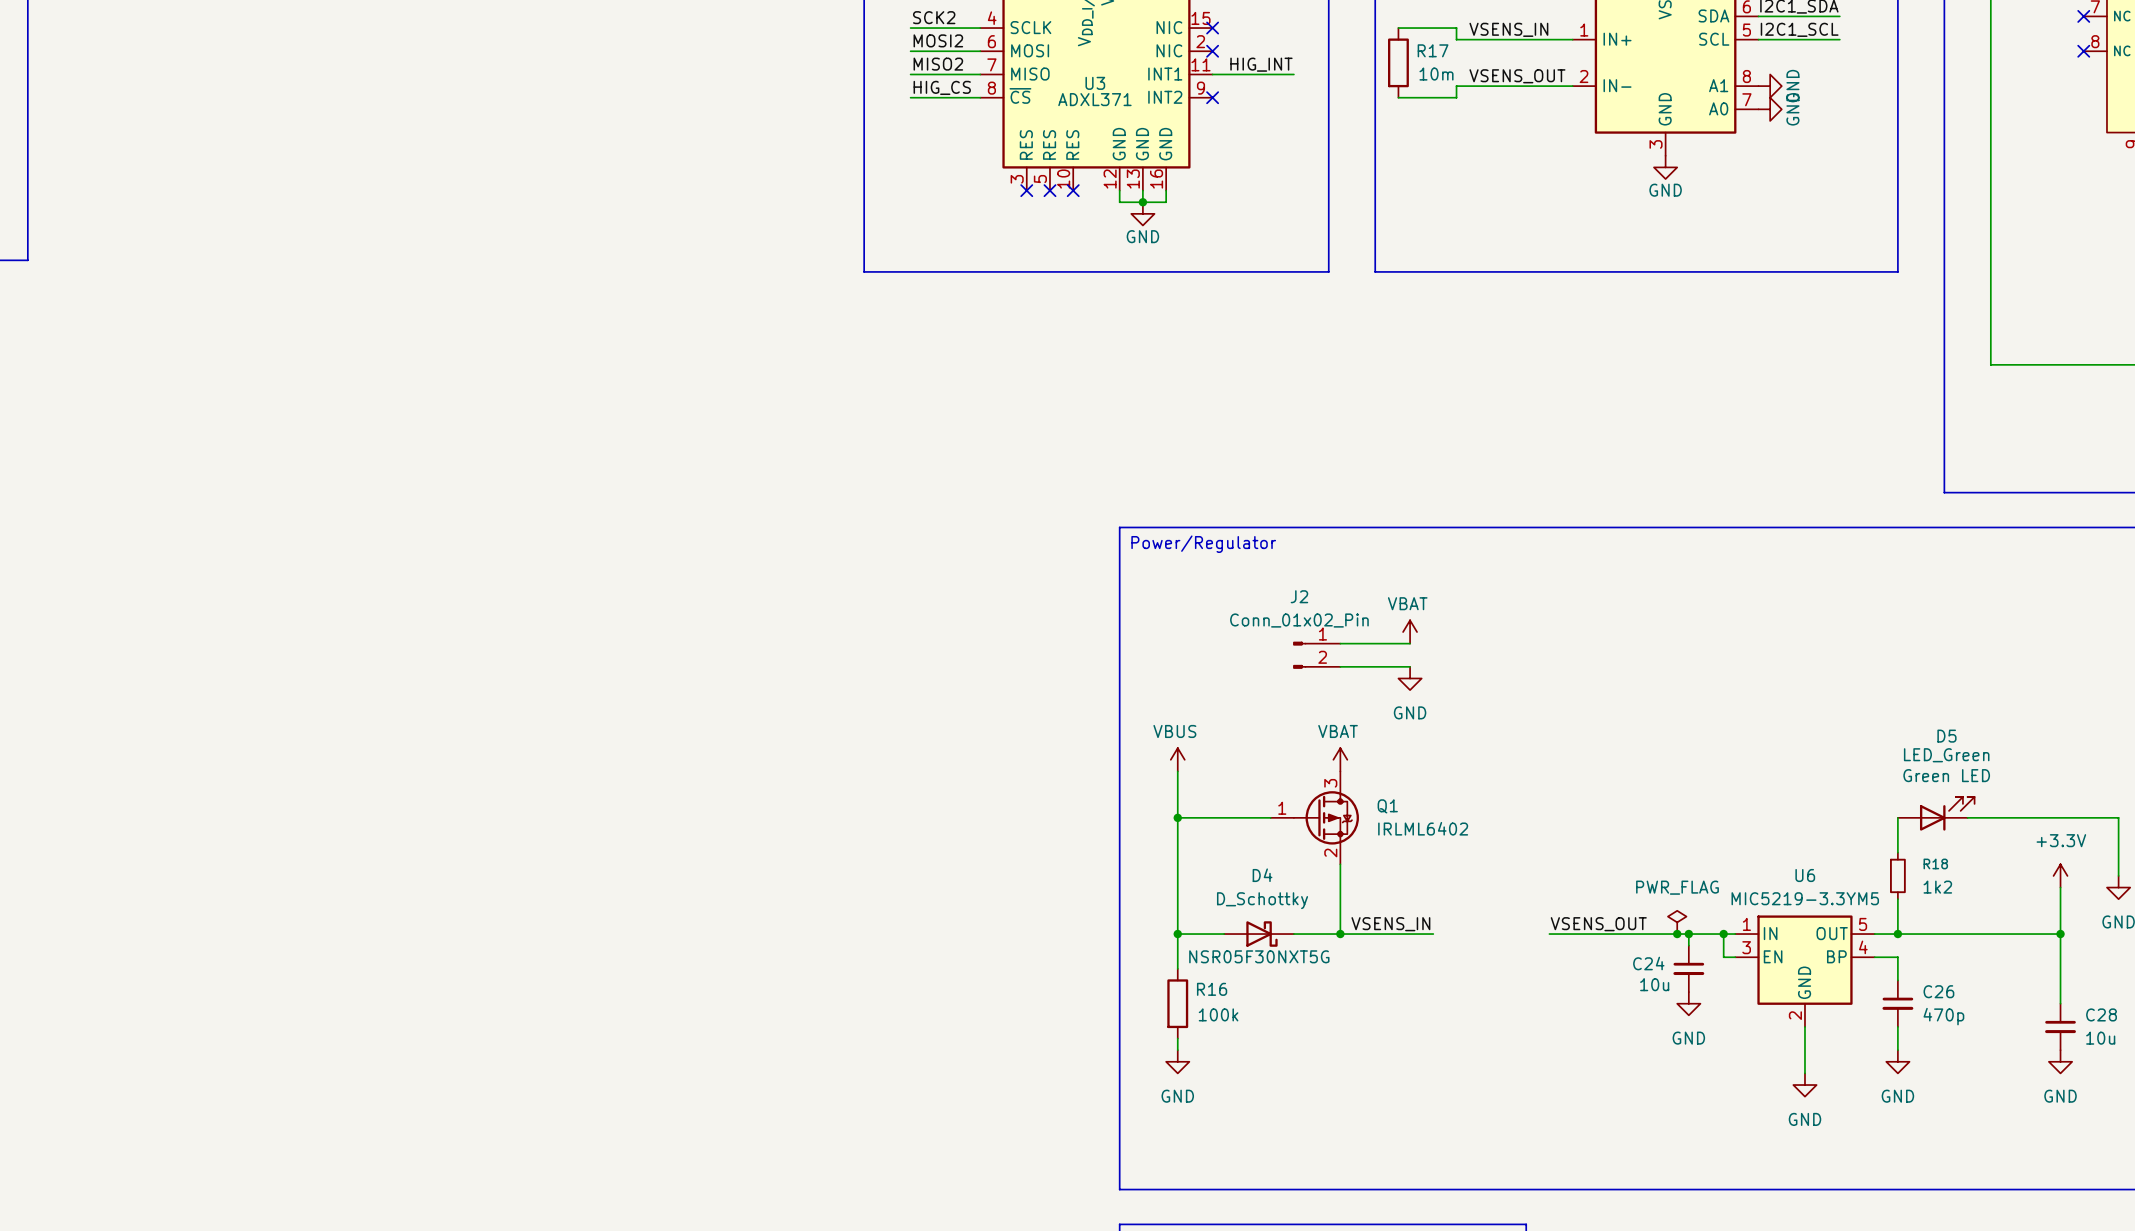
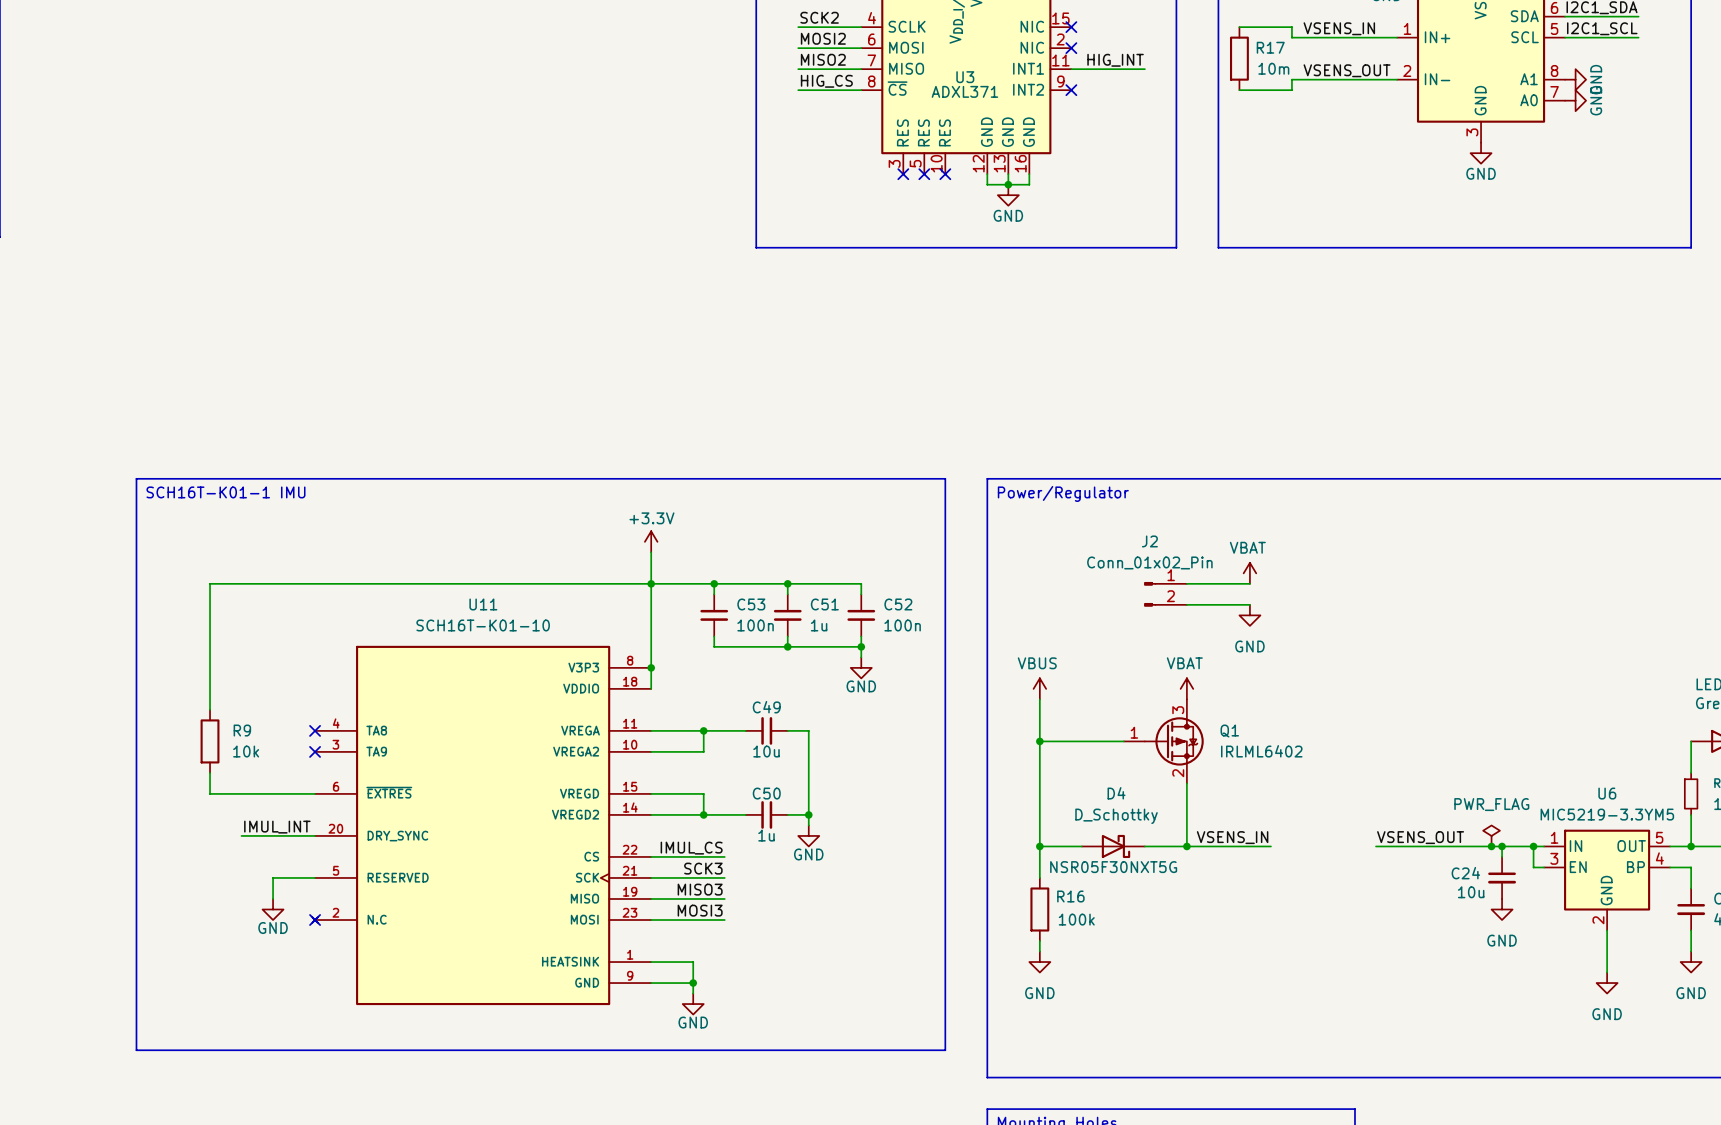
line: none -> (136, 478) (945, 478) (945, 1050) (136, 1050) (136, 478)
text: none -> SCH16T-K01-1 IMU (225, 492)
power symbol: none -> +3.3V (651, 541)
wire: none -> (651, 552) (651, 688)
junction: none -> (651, 583)
wire: none -> (714, 583) (714, 594)
junction: none -> (714, 583)
wire: none -> (787, 583) (787, 594)
junction: none -> (787, 583)
wire: none -> (861, 594) (861, 583) (210, 583) (210, 709)
C53: none -> 100n (714, 615)
C51: none -> 1u (787, 615)
C52: none -> 100n (861, 615)
wire: none -> (714, 636) (714, 646) (861, 646)
wire: none -> (787, 636) (787, 646)
wire: none -> (861, 636) (861, 657)
junction: none -> (787, 646)
junction: none -> (861, 646)
junction: none -> (651, 667)
power symbol: none -> GND (861, 667)
no-connect mark: none -> (315, 730)
wire: none -> (651, 730) (745, 730)
wire: none -> (703, 730) (703, 751) (651, 751)
junction: none -> (703, 730)
C49: none -> 10u (766, 730)
wire: none -> (787, 730) (808, 730) (808, 825)
R9: none -> 10k (210, 741)
no-connect mark: none -> (315, 751)
wire: none -> (210, 772) (210, 793) (315, 793)
wire: none -> (651, 793) (703, 793) (703, 814)
wire: none -> (651, 814) (745, 814)
junction: none -> (703, 814)
C50: none -> 1u (766, 814)
wire: none -> (787, 814) (808, 814)
junction: none -> (808, 814)
U11: none -> SCH16T-K01-10 (481, 825)
label: none -> IMUL_INT (277, 827)
wire: none -> (241, 835) (315, 835)
power symbol: none -> GND (808, 835)
label: none -> IMUL_CS (691, 848)
wire: none -> (651, 856) (724, 856)
label: none -> SCK3 (703, 868)
wire: none -> (315, 877) (273, 877) (273, 898)
wire: none -> (651, 877) (724, 877)
label: none -> MISO3 (700, 889)
wire: none -> (651, 898) (724, 898)
power symbol: none -> GND (273, 909)
label: none -> MOSI3 (700, 910)
no-connect mark: none -> (315, 920)
wire: none -> (651, 920) (724, 920)
wire: none -> (651, 962) (693, 962) (693, 993)
wire: none -> (651, 983) (693, 983)
junction: none -> (693, 983)
power symbol: none -> GND (693, 1004)

